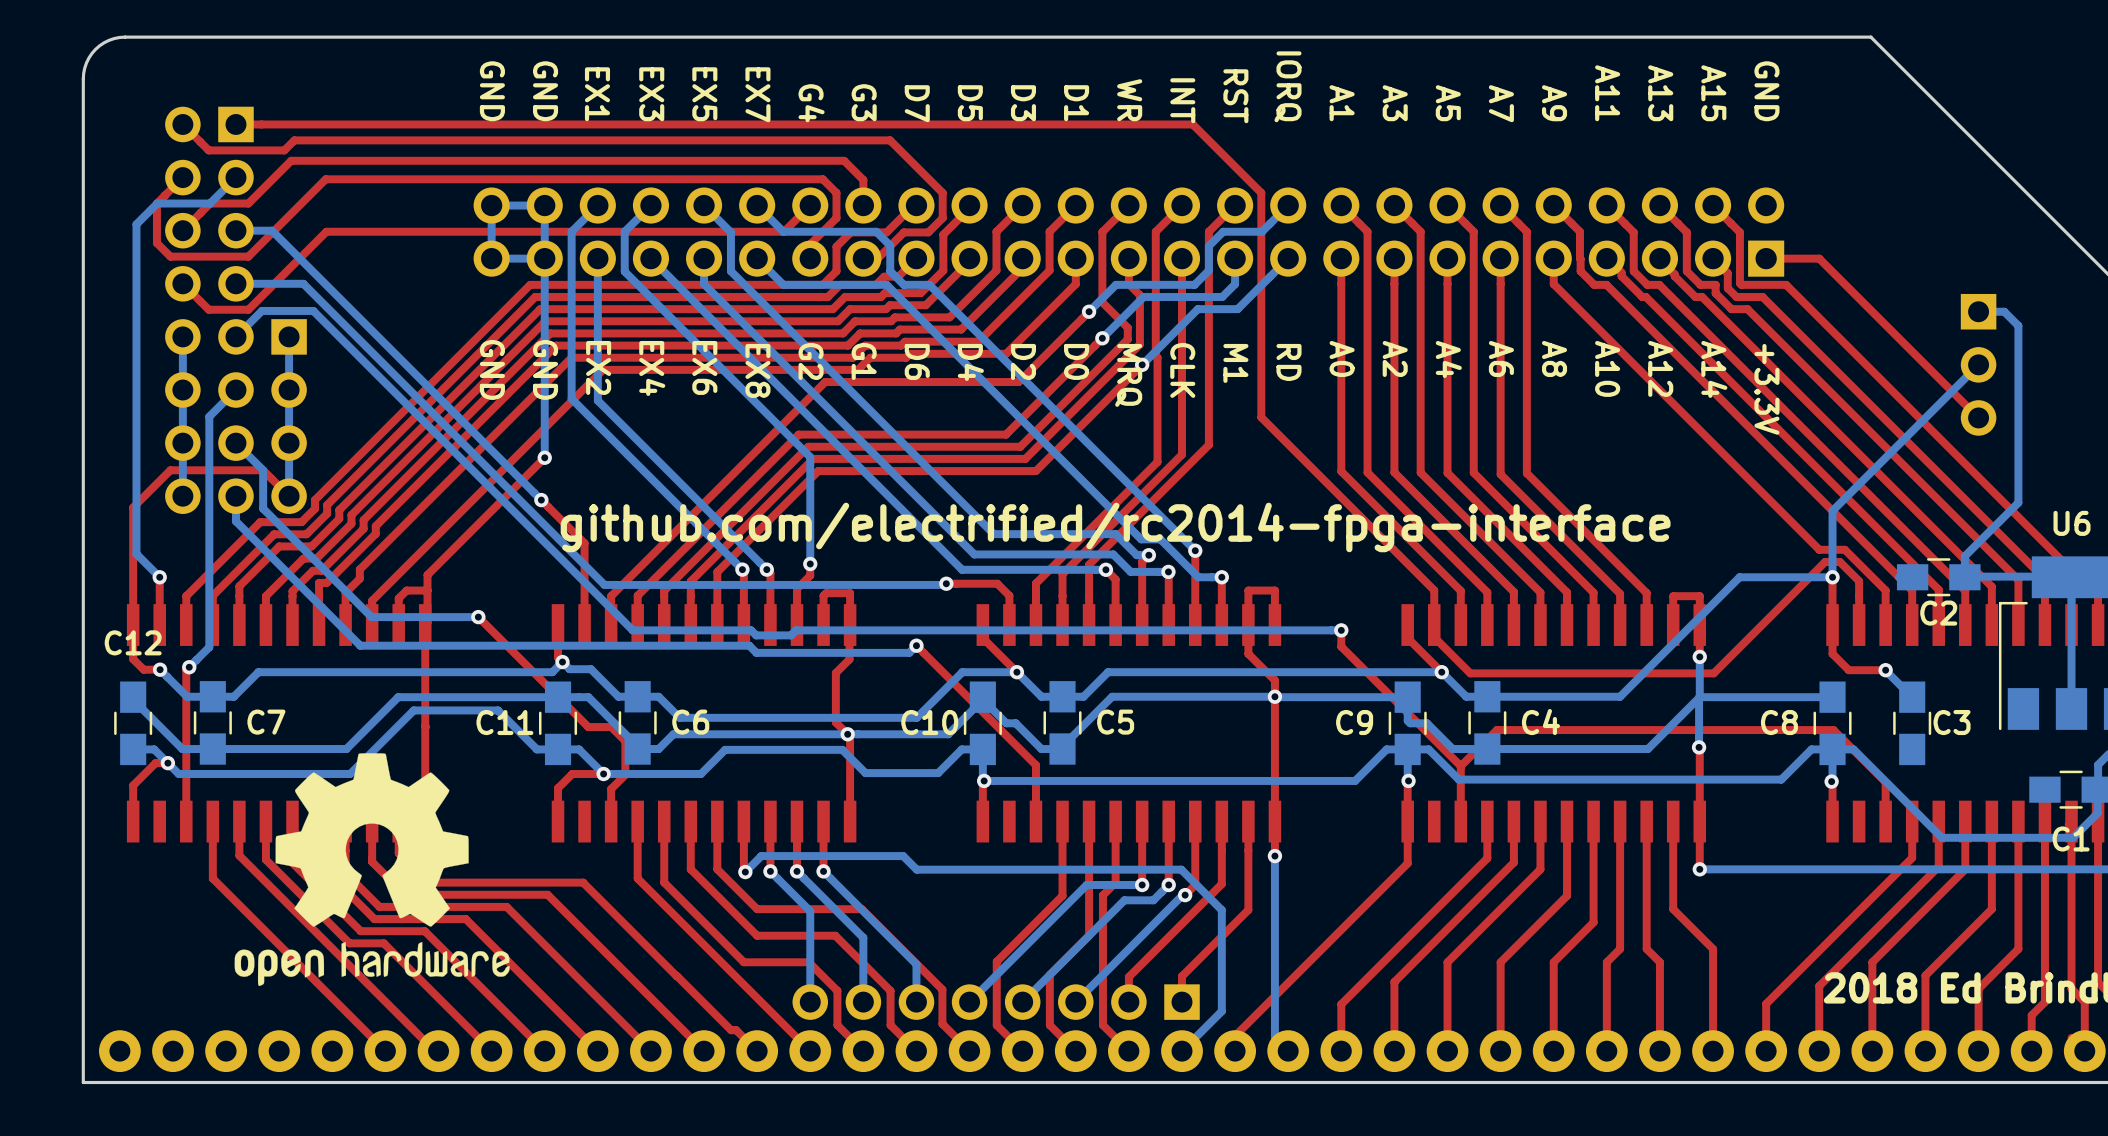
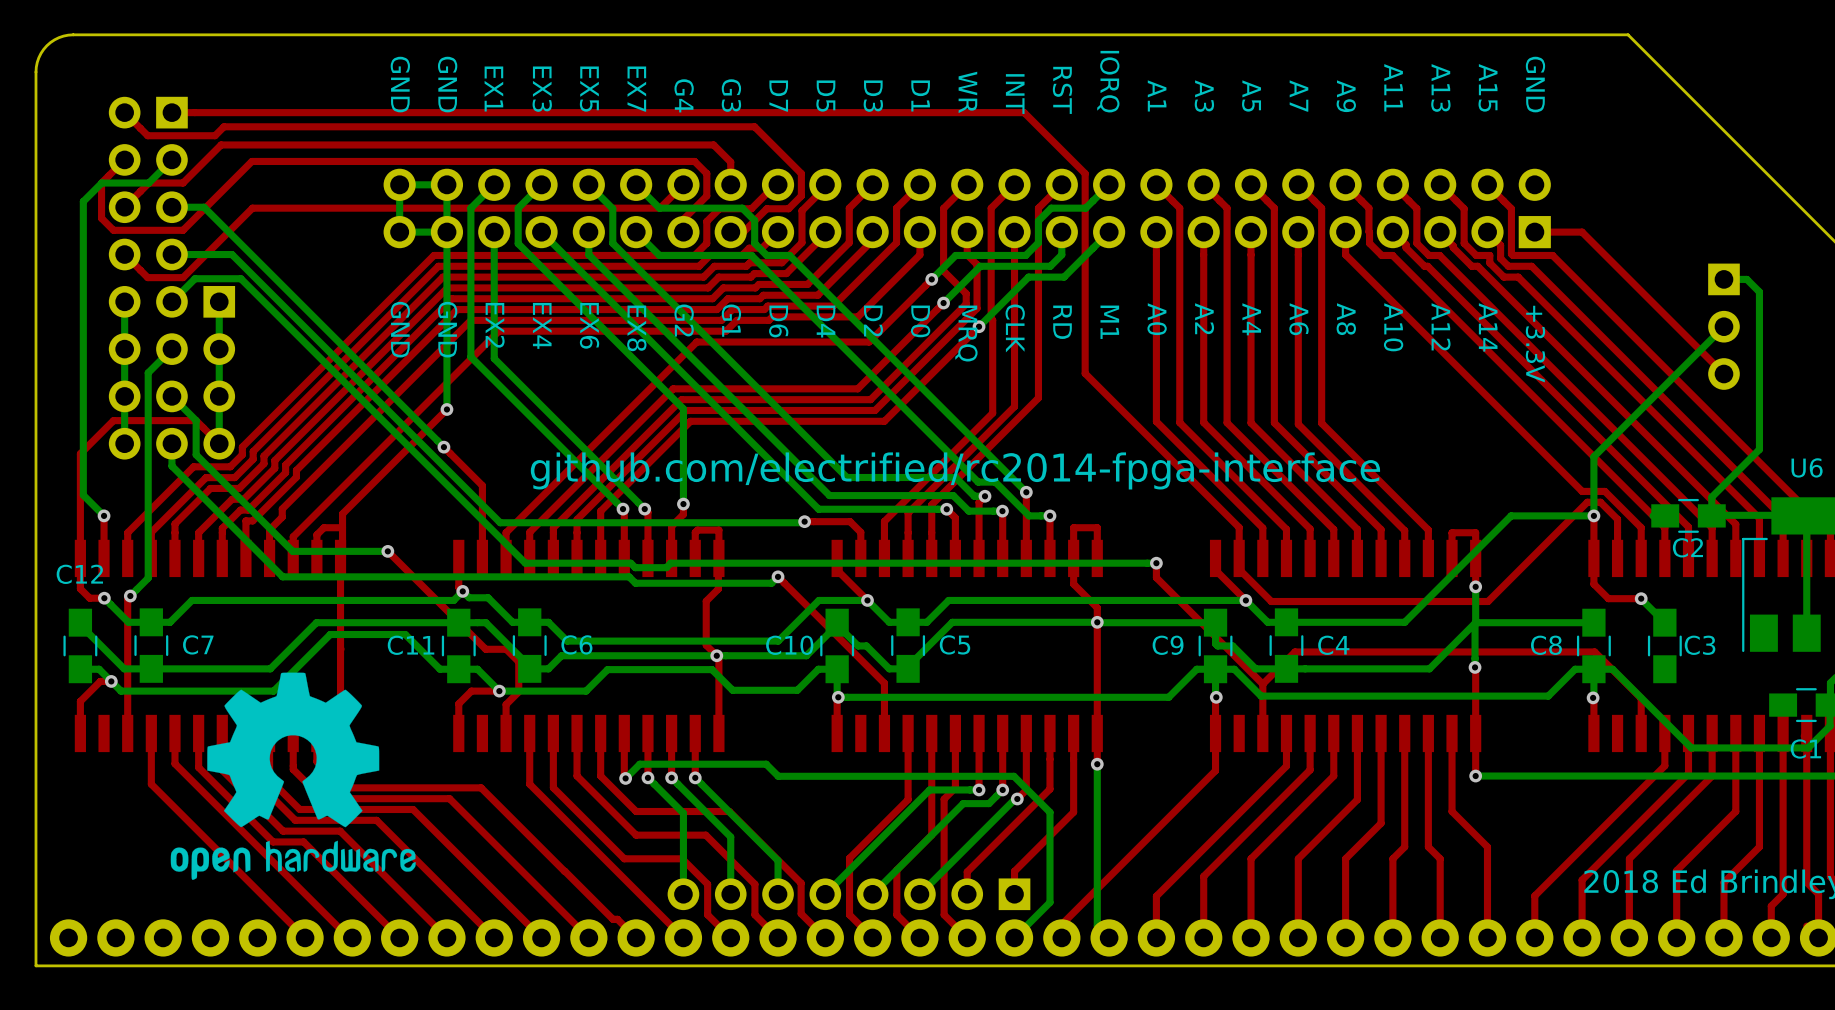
text: RD (1288, 362) -> M1 (1109, 322)
text: M1 (1235, 363) -> RD (1062, 322)

